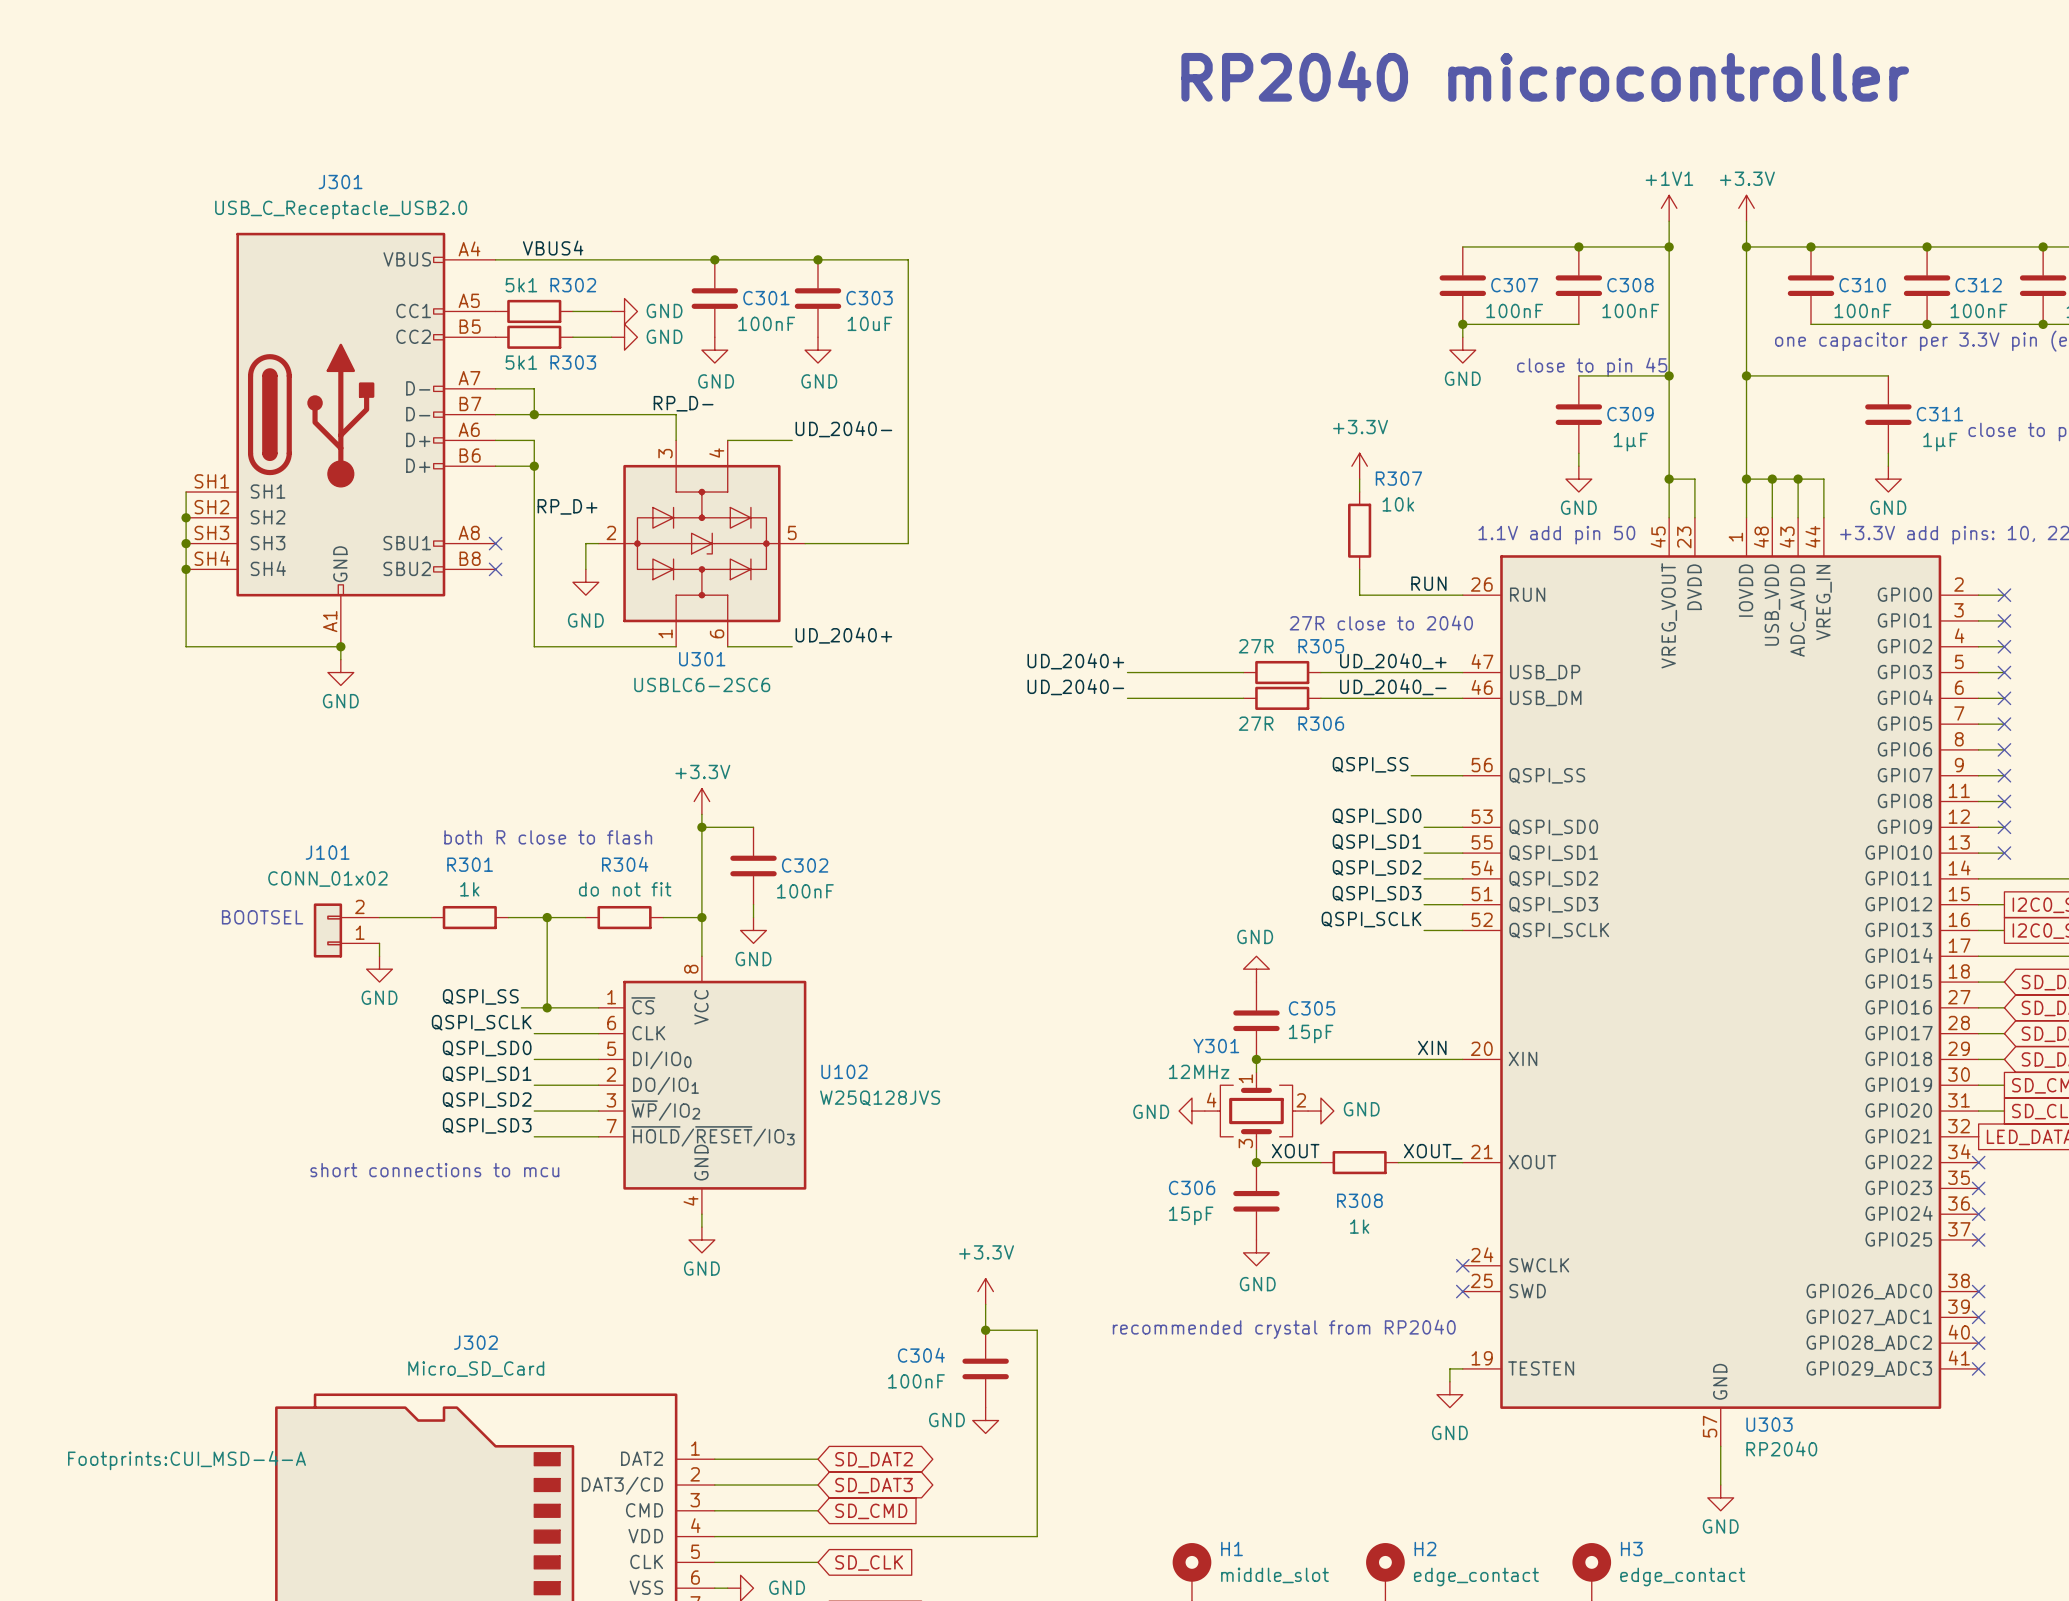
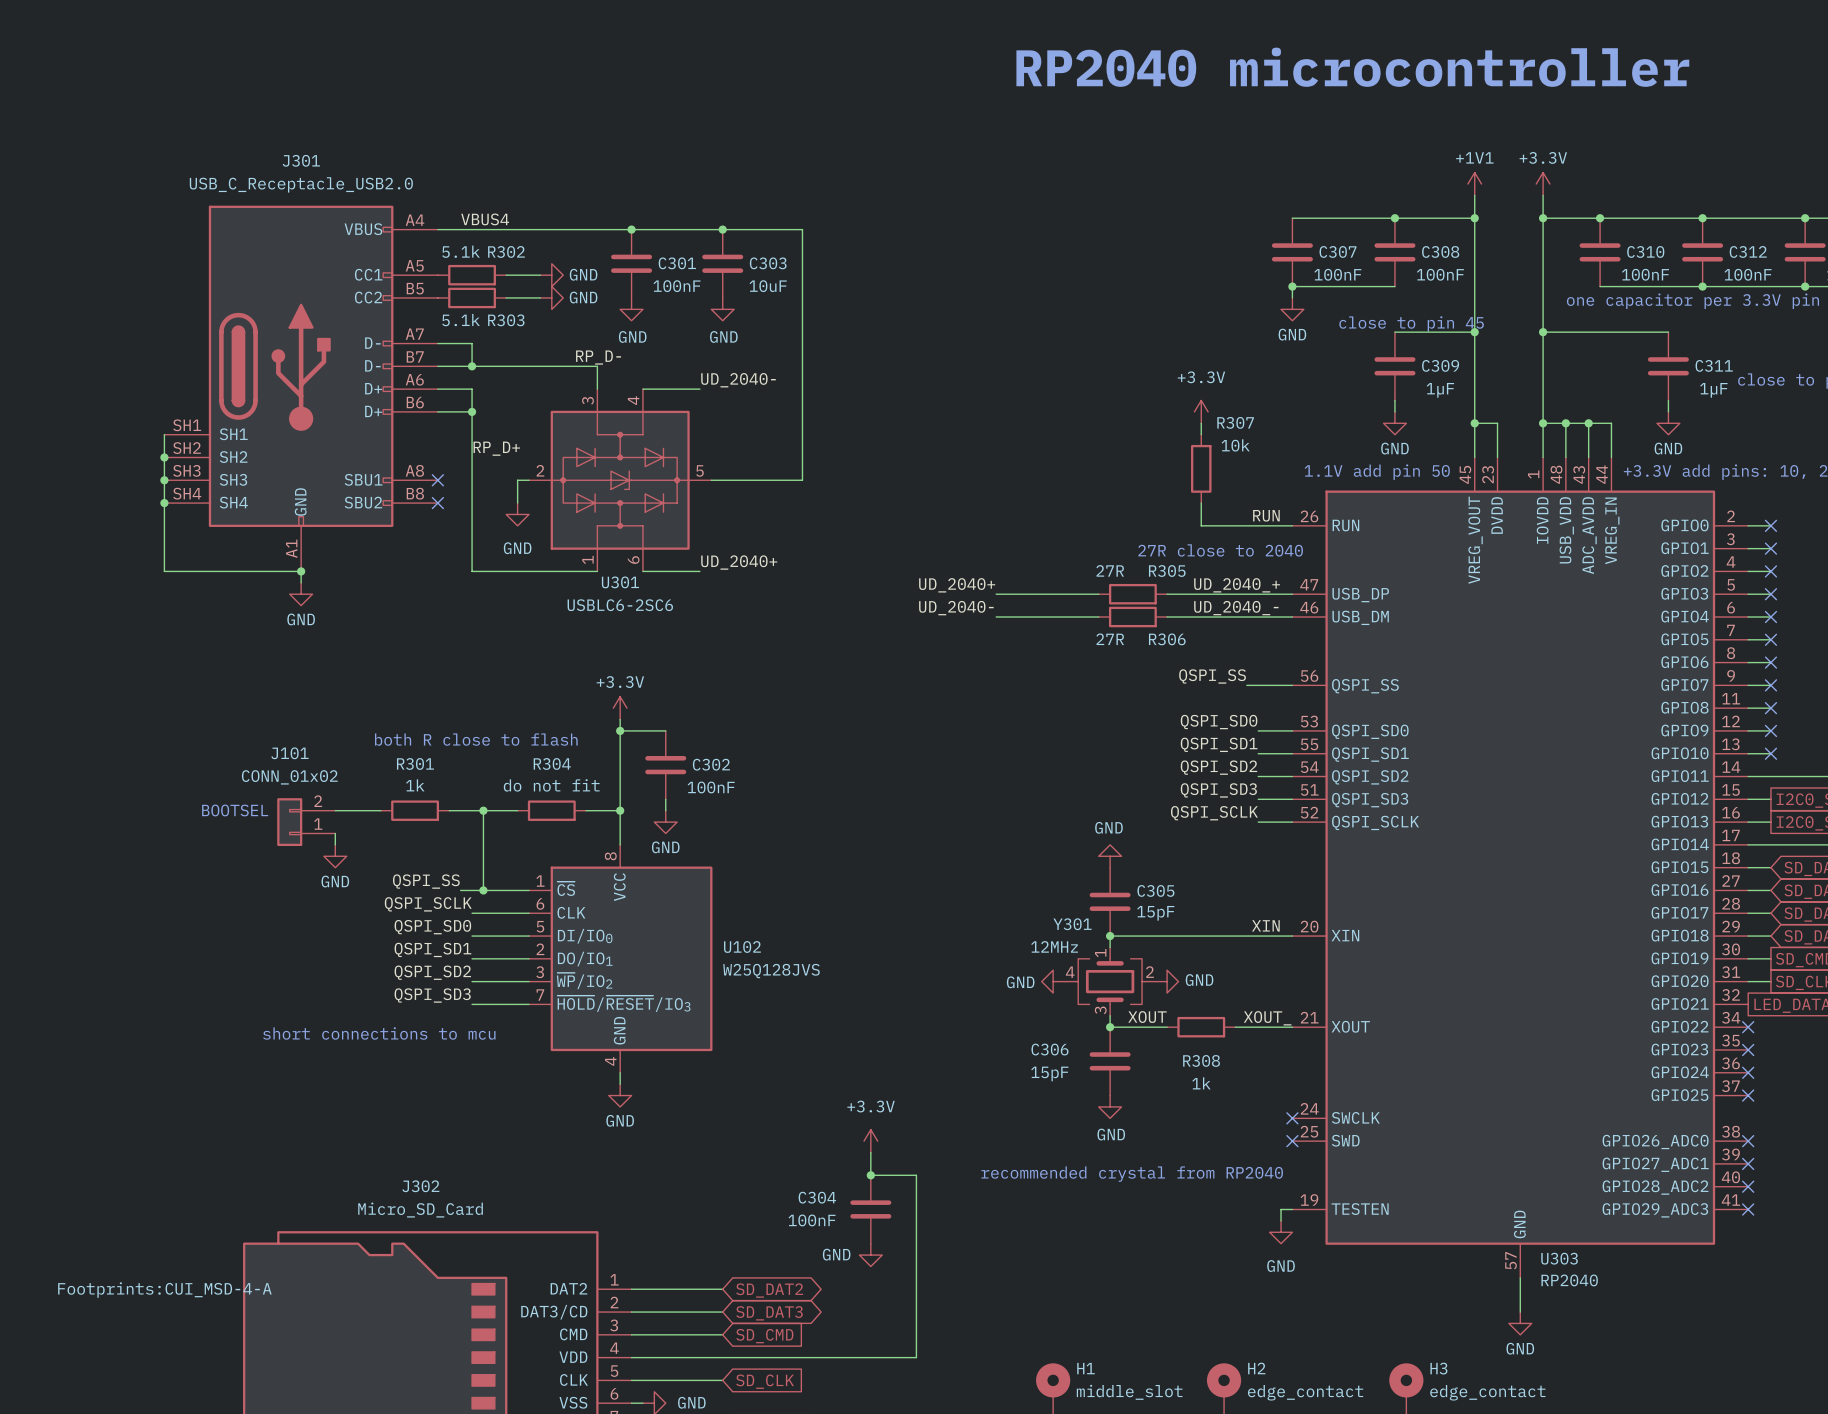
R302 value: 5k1 (521, 285) -> 5.1k (461, 251)
R303 value: 5k1 (521, 362) -> 5.1k (461, 320)

